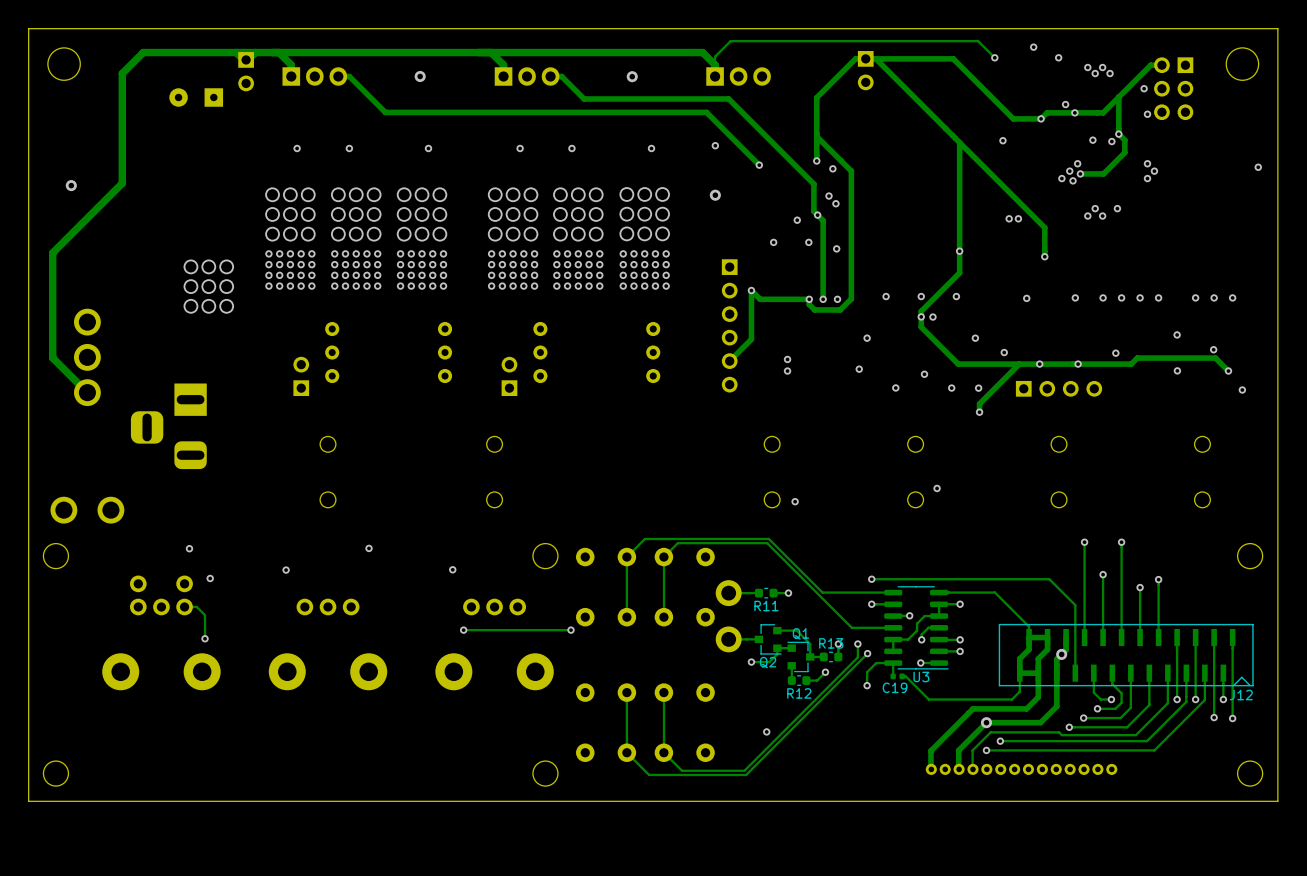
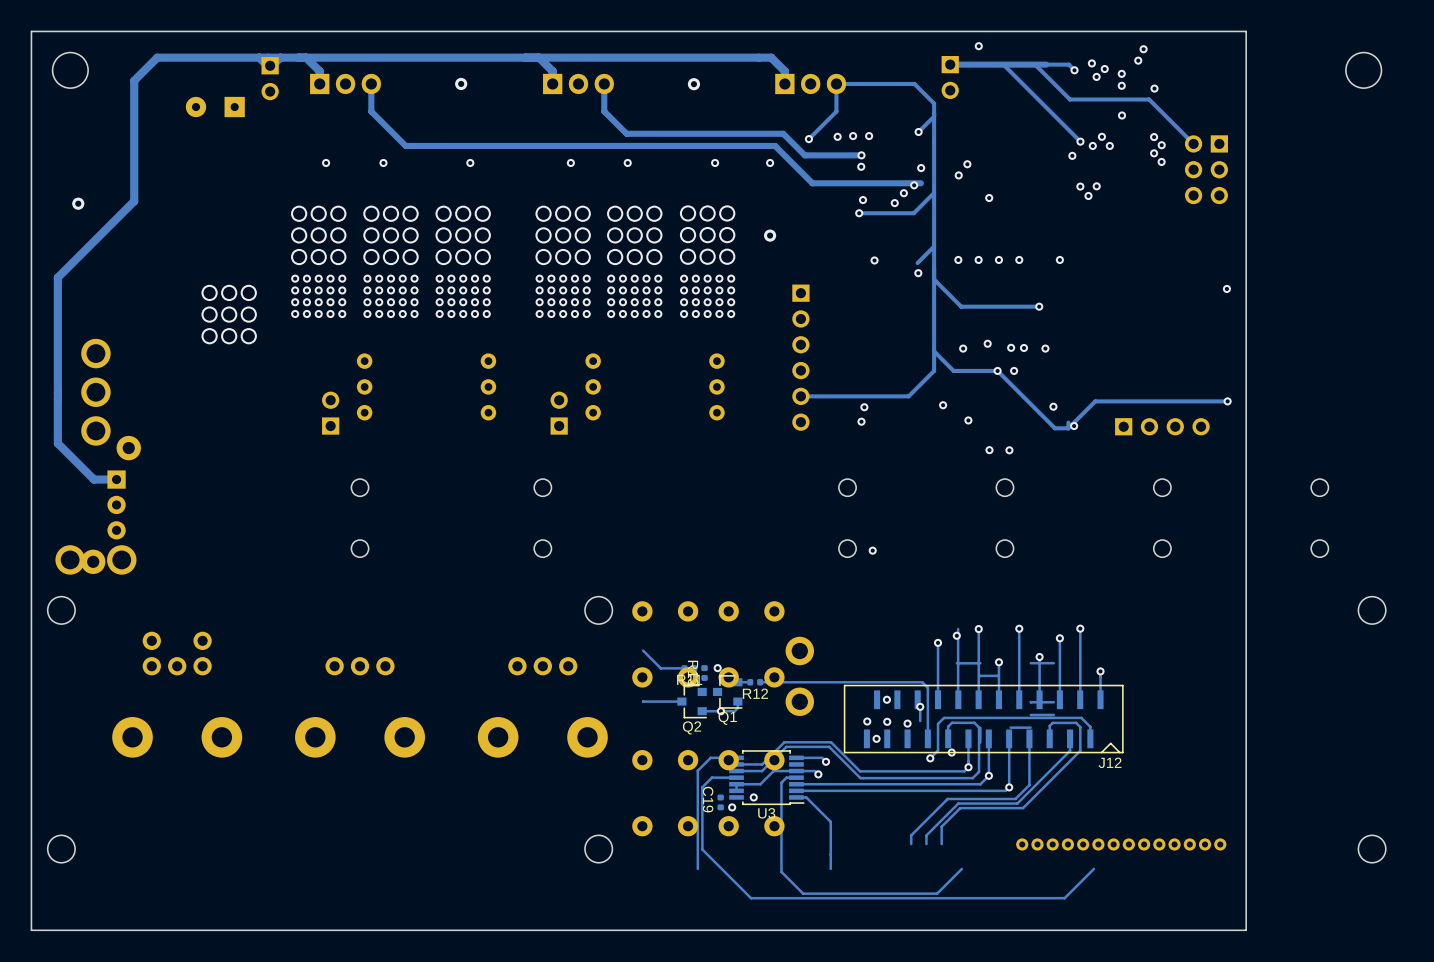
board edge: (1135, 28) (1277, 28) (1277, 801) (28, 801) -> (1246, 31) (1246, 930) (31, 930) (31, 879)
via: none -> (978, 46)
via: none -> (1143, 49)
via: (1033, 47) -> none
via: none -> (1138, 60)
track: (994, 57) (978, 41) (730, 41) (715, 56) (715, 76) -> none
via: (1058, 57) -> none
track: (865, 58) (855, 58) (816, 97) (816, 160) -> none
track: (875, 58) (1044, 227) (1044, 256) -> none
track: none -> (1003, 64) (1080, 141)
track: none -> (1035, 64) (1069, 99) (1149, 99) (1193, 143)
track: (953, 58) (1013, 118) (1041, 118) (1047, 112) (1103, 112) (1150, 65) (1161, 65) -> (1046, 64) (1068, 64) (1074, 70)
via: none -> (1104, 69)
via: none -> (1074, 70)
via: none -> (1121, 73)
via: (1087, 67) -> none
via: (1102, 67) -> none
via: none -> (1096, 76)
via: (1095, 73) -> none
via: (1110, 73) -> none
track: (338, 76) (349, 76) (385, 112) (706, 112) (759, 165) -> (371, 83) (371, 111) (405, 145) (775, 145) (812, 183) (920, 183)
track: (550, 76) (561, 76) (584, 98) (728, 98) (813, 184) (813, 211) (823, 220) (823, 299) -> (604, 83) (604, 111) (626, 133) (783, 133) (804, 155) (861, 155)
via: none -> (1121, 85)
via: none -> (1154, 88)
via: (1144, 88) -> none
part position: (1173, 88) -> (1206, 169)
track: (1118, 97) (1118, 134) (1124, 140) (1124, 152) (1103, 173) (1080, 173) -> none
via: (1065, 104) -> none
via: none -> (1122, 115)
track: none -> (934, 116) (918, 132)
via: (1074, 112) -> none
via: (1147, 114) -> none
via: (1041, 118) -> none
via: none -> (918, 132)
via: none -> (853, 136)
via: none -> (869, 136)
via: none -> (837, 136)
via: none -> (1101, 136)
via: none -> (1154, 137)
via: none -> (808, 139)
via: none -> (1080, 141)
via: none -> (1092, 145)
via: none -> (1109, 145)
via: none -> (1161, 145)
track: (816, 133) (816, 136) (851, 171) (851, 298) (840, 309) (814, 309) (809, 304) (809, 299) (760, 299) (751, 290) (751, 339) (729, 361) -> (808, 139) (836, 111) (836, 83) (914, 83) (934, 103) (934, 370) (908, 396) (800, 396)
via: (1118, 134) -> none
track: (955, 138) (959, 142) (959, 272) (921, 311) (921, 327) (958, 364) (1131, 364) (1137, 358) (1215, 358) (1228, 371) -> none
via: none -> (1154, 153)
via: (1002, 140) -> none
via: (1092, 140) -> none
via: none -> (861, 155)
via: (1111, 141) -> none
via: none -> (1072, 155)
via position: (715, 145) -> (770, 162)
via: none -> (1161, 161)
via: none -> (967, 164)
via: none -> (861, 166)
via: none -> (921, 168)
via: none -> (958, 175)
via: (816, 160) -> none
via: (1077, 163) -> none
via: (1147, 163) -> none
via: (759, 165) -> none
via: (1258, 167) -> none
via: none -> (1096, 186)
via: none -> (1080, 186)
via: (1069, 171) -> none
via: (1154, 171) -> none
via: (1080, 173) -> none
track: none -> (934, 192) (913, 213) (859, 213)
via: none -> (903, 193)
via: none -> (1088, 195)
via: (1061, 178) -> none
via: (1147, 178) -> none
via: none -> (989, 198)
via: (1073, 180) -> none
via: none -> (863, 200)
via: none -> (894, 203)
via: none -> (859, 213)
via position: (715, 195) -> (770, 235)
via: (828, 196) -> none
via: (835, 203) -> none
via: (1095, 208) -> none
via: (1117, 208) -> none
via: (817, 215) -> none
via: (1087, 216) -> none
via: (1102, 216) -> none
via: (1009, 218) -> none
via: (1018, 218) -> none
via: (797, 220) -> none
track: none -> (934, 246) (917, 263)
via: none -> (958, 259)
via: none -> (978, 259)
via: none -> (998, 259)
via: none -> (1019, 259)
via: none -> (1059, 259)
via: none -> (874, 260)
via: (773, 242) -> none
via: (808, 242) -> none
via: (959, 251) -> none
track: none -> (934, 279) (961, 306) (1039, 306)
via: (1044, 256) -> none
via: none -> (1226, 288)
via: none -> (1039, 306)
via: (751, 290) -> none
via: (886, 296) -> none
via: (921, 296) -> none
via: (956, 296) -> none
via: (1075, 297) -> none
via: (1103, 297) -> none
via: (1121, 297) -> none
via: (1140, 297) -> none
via: (1158, 297) -> none
via: (1195, 297) -> none
via: (1214, 297) -> none
via: (1232, 297) -> none
via: (1026, 298) -> none
via: (809, 299) -> none
via: (823, 299) -> none
via: (837, 299) -> none
via: none -> (987, 343)
via: none -> (963, 348)
via: none -> (1045, 348)
track: none -> (934, 351) (953, 370) (997, 370) (1054, 428) (1068, 428)
via: (1177, 334) -> none
via: none -> (997, 370)
via: none -> (1014, 370)
via: (867, 338) -> none
via: (975, 338) -> none
via: (1213, 349) -> none
via: (1004, 352) -> none
via position: (1115, 353) -> (1227, 401)
track: (52, 357) (87, 392) -> (57, 392) (57, 443) (94, 479) (116, 479)
via position: (787, 359) -> (861, 421)
track: (1019, 364) (979, 403) (979, 412) -> none
via: (1039, 364) -> none
via: (1078, 364) -> none
track: none -> (1227, 401) (1095, 401) (1068, 428)
via: none -> (1053, 406)
via: (1177, 370) -> none
via: (1228, 371) -> none
via: (924, 374) -> none
via: none -> (968, 420)
track: none -> (1068, 422) (1068, 428)
via: (895, 387) -> none
via: (951, 388) -> none
via: (1242, 390) -> none
via: none -> (989, 450)
via: none -> (1009, 450)
via: (979, 412) -> none
part: (168, 426) -> none
part: none -> (110, 504)
via: (937, 488) -> none
track: (1084, 542) (1084, 637) -> none
via: (1084, 542) -> none
track: (1121, 542) (1121, 637) -> none
via: (1121, 542) -> none
via: (189, 548) -> none
via: (369, 548) -> none
via: (452, 569) -> none
via: (286, 570) -> none
track: none -> (1019, 628) (1019, 699)
via: none -> (1019, 628)
track: none -> (1080, 628) (1080, 699)
via: none -> (1080, 628)
track: none -> (958, 629) (958, 699)
track: none -> (978, 629) (978, 699)
via: none -> (978, 629)
track: (1103, 574) (1103, 637) -> none
via: (1103, 574) -> none
via: (210, 578) -> none
track: (871, 579) (1049, 579) (1075, 605) (1075, 673) -> none
track: (1158, 579) (1158, 637) -> none
via: (1158, 579) -> none
track: none -> (1059, 638) (1059, 699)
via: none -> (1059, 638)
track: none -> (938, 642) (938, 699)
via: none -> (938, 642)
U3 footprint: [884, 586, 949, 670] -> [729, 750, 805, 806]
R11 footprint: [754, 587, 778, 599] -> [681, 665, 698, 672]
track: (1140, 587) (1140, 637) -> none
via: (1140, 587) -> none
track: none -> (643, 650) (660, 668) (684, 668)
track: (893, 592) (822, 592) (768, 538) (644, 538) (626, 557) (626, 617) -> none
track: (939, 592) (994, 592) (1029, 626) (1029, 637) -> none
track: (758, 593) (728, 593) -> none
track: (788, 593) (773, 593) -> none
via: (788, 593) -> none
track: none -> (1039, 656) (1039, 699)
via: none -> (1039, 656)
track: none -> (998, 662) (998, 699)
via: (871, 604) -> none
track: (939, 604) (939, 616) (924, 616) (917, 623) (917, 630) (908, 639) (893, 639) (893, 651) -> none
via: (960, 604) -> none
track: (185, 607) (196, 607) (205, 615) (205, 638) -> none
via: none -> (717, 668)
track: none -> (1100, 671) (1100, 699)
via: none -> (1100, 671)
via position: (909, 615) -> (998, 662)
track: (664, 617) (664, 557) (677, 543) (767, 543) (851, 627) (893, 627) -> none
track: none -> (750, 682) (737, 682)
track: none -> (760, 682) (922, 682) (927, 687) (927, 738)
track: (939, 627) (928, 627) (921, 634) (921, 639) -> none
via: (463, 630) -> none
track: (571, 630) (463, 630) -> none
via: (571, 630) -> none
track: (777, 630) (796, 630) (810, 644) (810, 656) (823, 656) -> none
via: none -> (886, 699)
track: (1029, 637) (1029, 649) (1019, 658) (1019, 673) -> none
track: (1029, 637) (1047, 637) (1047, 649) (1038, 658) (1038, 697) (1026, 708) (972, 708) (930, 750) (930, 769) -> none
track: (1066, 637) (1066, 650) (1056, 659) (1056, 706) (1040, 722) (986, 722) (958, 750) (958, 769) -> none
track: (1177, 637) (1177, 699) -> none
track: (1195, 637) (1195, 699) -> none
track: (1214, 637) (1214, 717) -> none
track: (1232, 637) (1232, 718) -> none
via: (205, 638) -> none
track: none -> (643, 701) (681, 701)
track: none -> (737, 701) (737, 708) (734, 711) (702, 711)
track: (758, 639) (728, 639) -> none
Q2 position: (768, 639) -> (692, 701)
via: (921, 639) -> none
via: (960, 639) -> none
track: (857, 644) (857, 657) (744, 770) (682, 770) (664, 752) (664, 692) -> none
via: (857, 644) -> none
via: none -> (720, 711)
track: (791, 648) (777, 648) (777, 654) (769, 662) (751, 662) -> none
R13 footprint: [819, 651, 843, 663] -> [701, 665, 708, 681]
via: (960, 651) -> none
track: (867, 653) (746, 774) (649, 774) (626, 752) (626, 692) -> none
via: (867, 653) -> none
via: (1061, 654) -> none
J12 position: (1126, 655) -> (983, 719)
Q1 rotation: 0° (800, 656) -> 180° (727, 691)
Q1 position: (800, 656) -> (727, 691)
via: none -> (867, 721)
via: none -> (887, 721)
via: none -> (907, 723)
via: (751, 662) -> none
via: (920, 662) -> none
track: (893, 663) (876, 663) (867, 672) (867, 685) -> none
track: (791, 665) (791, 680) -> none
track: (825, 672) (817, 680) (806, 680) -> none
via: (825, 672) -> none
via: none -> (876, 738)
track: none -> (948, 738) (948, 726) (952, 722) (974, 722) (979, 727) (979, 771) (972, 778) (860, 778) (829, 746) (786, 746) (762, 771) (736, 771)
track: none -> (968, 738) (968, 767) (964, 771) (860, 771) (831, 742) (784, 742) (762, 764) (736, 764)
track: none -> (988, 738) (988, 775) (980, 784) (796, 784)
track: none -> (1009, 738) (1009, 787) (1005, 790) (796, 790)
track: none -> (1029, 738) (1029, 785) (1015, 798) (947, 798) (911, 835) (911, 844)
track: none -> (1049, 738) (1049, 725) (1052, 722) (1076, 722) (1080, 727) (1080, 750) (1023, 808) (960, 808) (941, 826) (941, 844)
track: none -> (1070, 738) (1070, 750) (1017, 803) (958, 803) (926, 835) (926, 844)
track: none -> (1090, 738) (1090, 726) (1081, 717) (944, 717) (938, 723) (938, 750) (930, 758)
track: (1019, 673) (1019, 691) (1011, 699) (928, 699) (905, 676) (902, 676) -> none
track: (1038, 673) (1019, 673) -> none
track: (1093, 673) (1093, 692) (1100, 699) (1111, 699) -> none
track: (1112, 673) (1112, 684) (1121, 693) (1121, 702) (1115, 708) (1097, 708) -> none
track: (1130, 673) (1130, 707) (1120, 718) (1083, 718) -> none
track: (1149, 673) (1149, 705) (1127, 727) (1069, 727) -> none
track: (1167, 673) (1167, 703) (1135, 735) (990, 732) (972, 750) (972, 769) -> none
track: (1186, 673) (1186, 701) (1147, 741) (1000, 741) -> none
track: (1204, 673) (1204, 699) (1154, 750) (986, 750) -> none
track: (1223, 673) (1223, 699) -> none
R12 footprint: [787, 675, 811, 686] -> [747, 679, 764, 686]
C19 rotation: 0° (897, 676) -> 90° clockwise (720, 802)
C19 position: (897, 676) -> (720, 802)
track: none -> (736, 757) (710, 757) (697, 770) (697, 868)
track: none -> (796, 757) (822, 757) (825, 761)
via: none -> (930, 758)
via: none -> (825, 761)
via: none -> (968, 767)
via: (1111, 699) -> none
via: (1177, 699) -> none
via: (1195, 699) -> none
via: (1223, 699) -> none
track: none -> (818, 774) (815, 771) (773, 771) (760, 784) (736, 784) (736, 790)
via: none -> (818, 774)
via: none -> (988, 775)
track: none -> (736, 777) (712, 777) (702, 787) (702, 849) (751, 898) (1064, 898) (1093, 868)
track: none -> (796, 777) (786, 777) (781, 782) (781, 871) (803, 893) (937, 893) (961, 868)
via: (1097, 708) -> none
via: none -> (1009, 787)
via: (1214, 717) -> none
via: (1083, 718) -> none
via: (1232, 718) -> none
via: (986, 722) -> none
via: none -> (753, 797)
track: none -> (796, 797) (806, 797) (830, 821) (830, 868)
via: (1069, 727) -> none
via: (766, 731) -> none
via: none -> (732, 807)
via: (1000, 741) -> none
via: (986, 750) -> none

